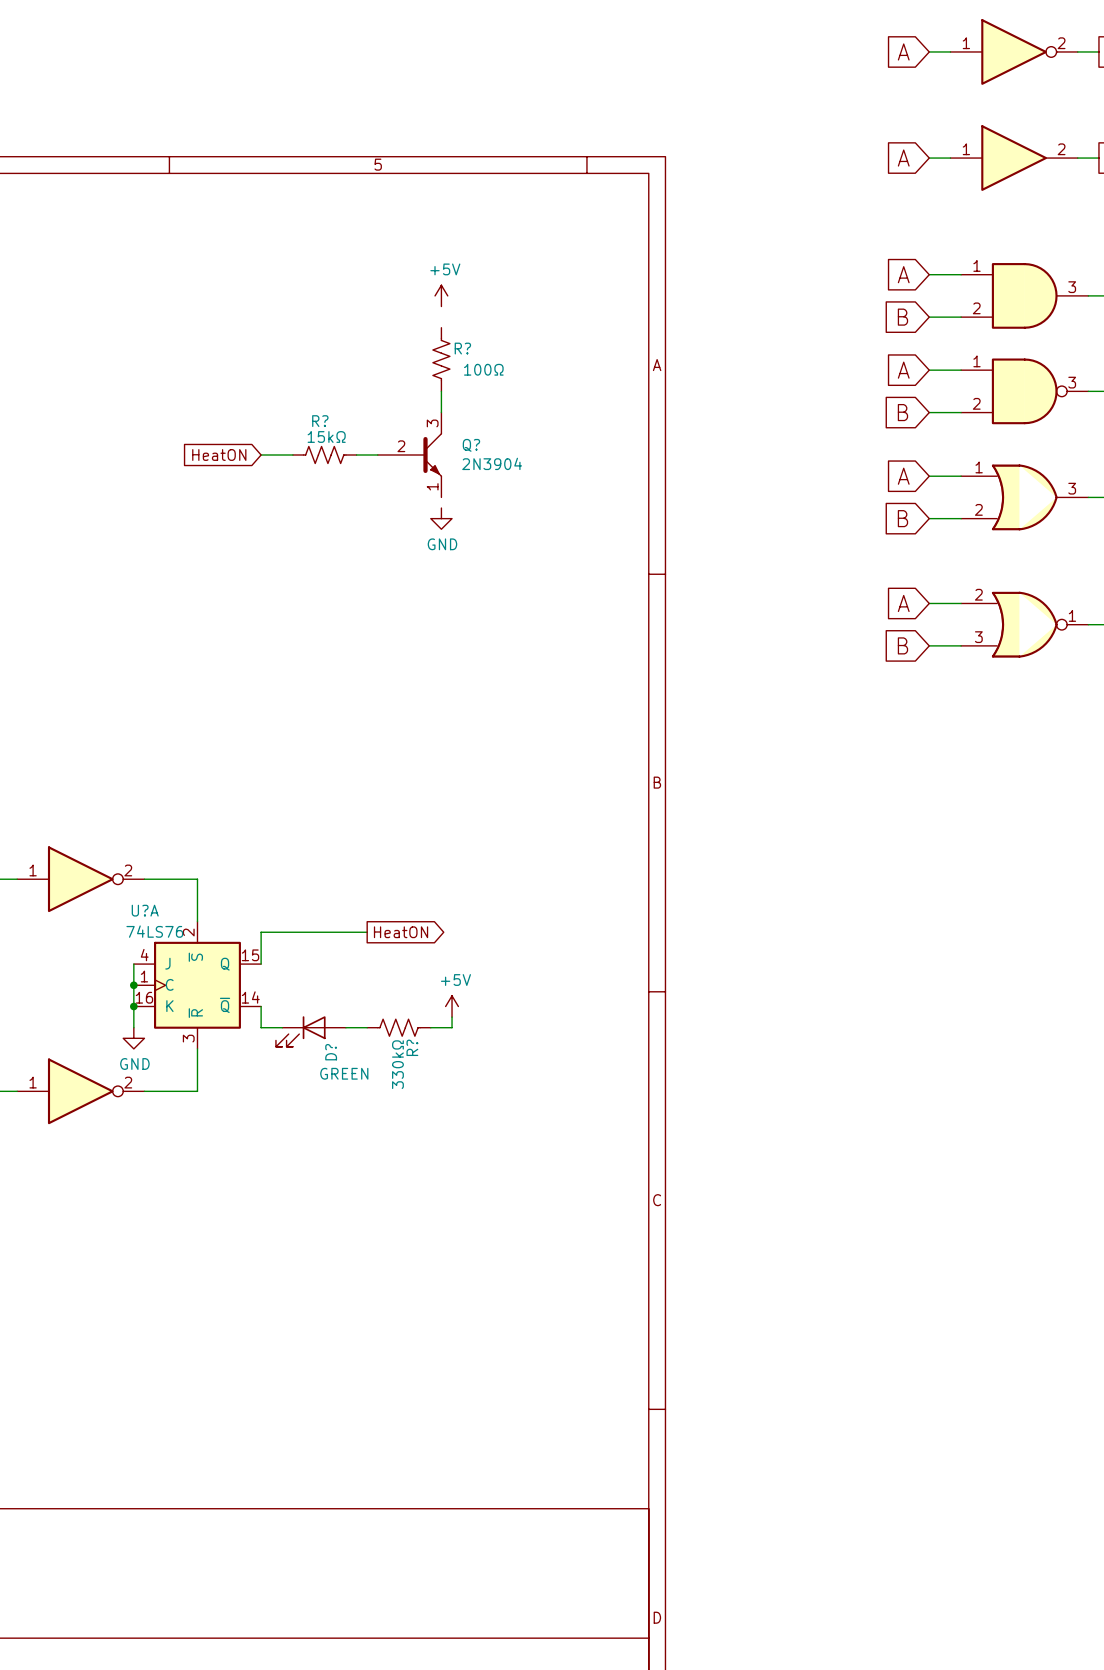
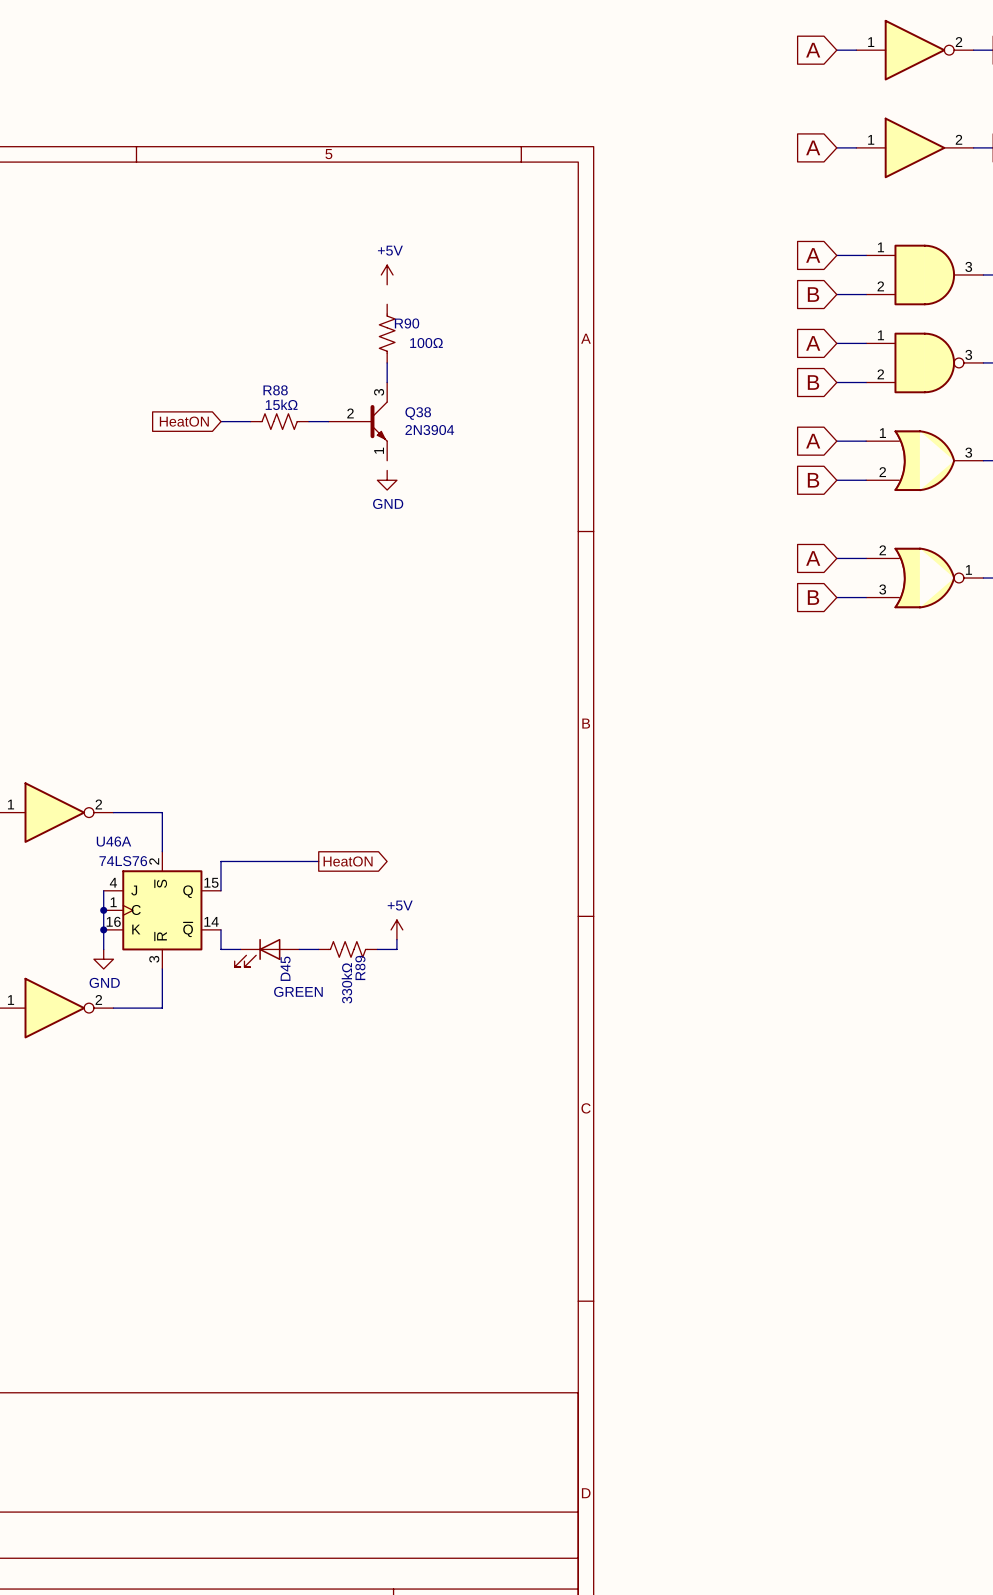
R? name: R? (462, 348) -> R90 (407, 323)
R? name: R? (320, 421) -> R88 (275, 390)
Q? name: Q? (471, 445) -> Q38 (418, 413)
U?A name: U?A (145, 910) -> U46A (114, 841)
R? name: R? (412, 1047) -> R89 (360, 967)
D? name: D? (331, 1052) -> D45 (285, 968)

